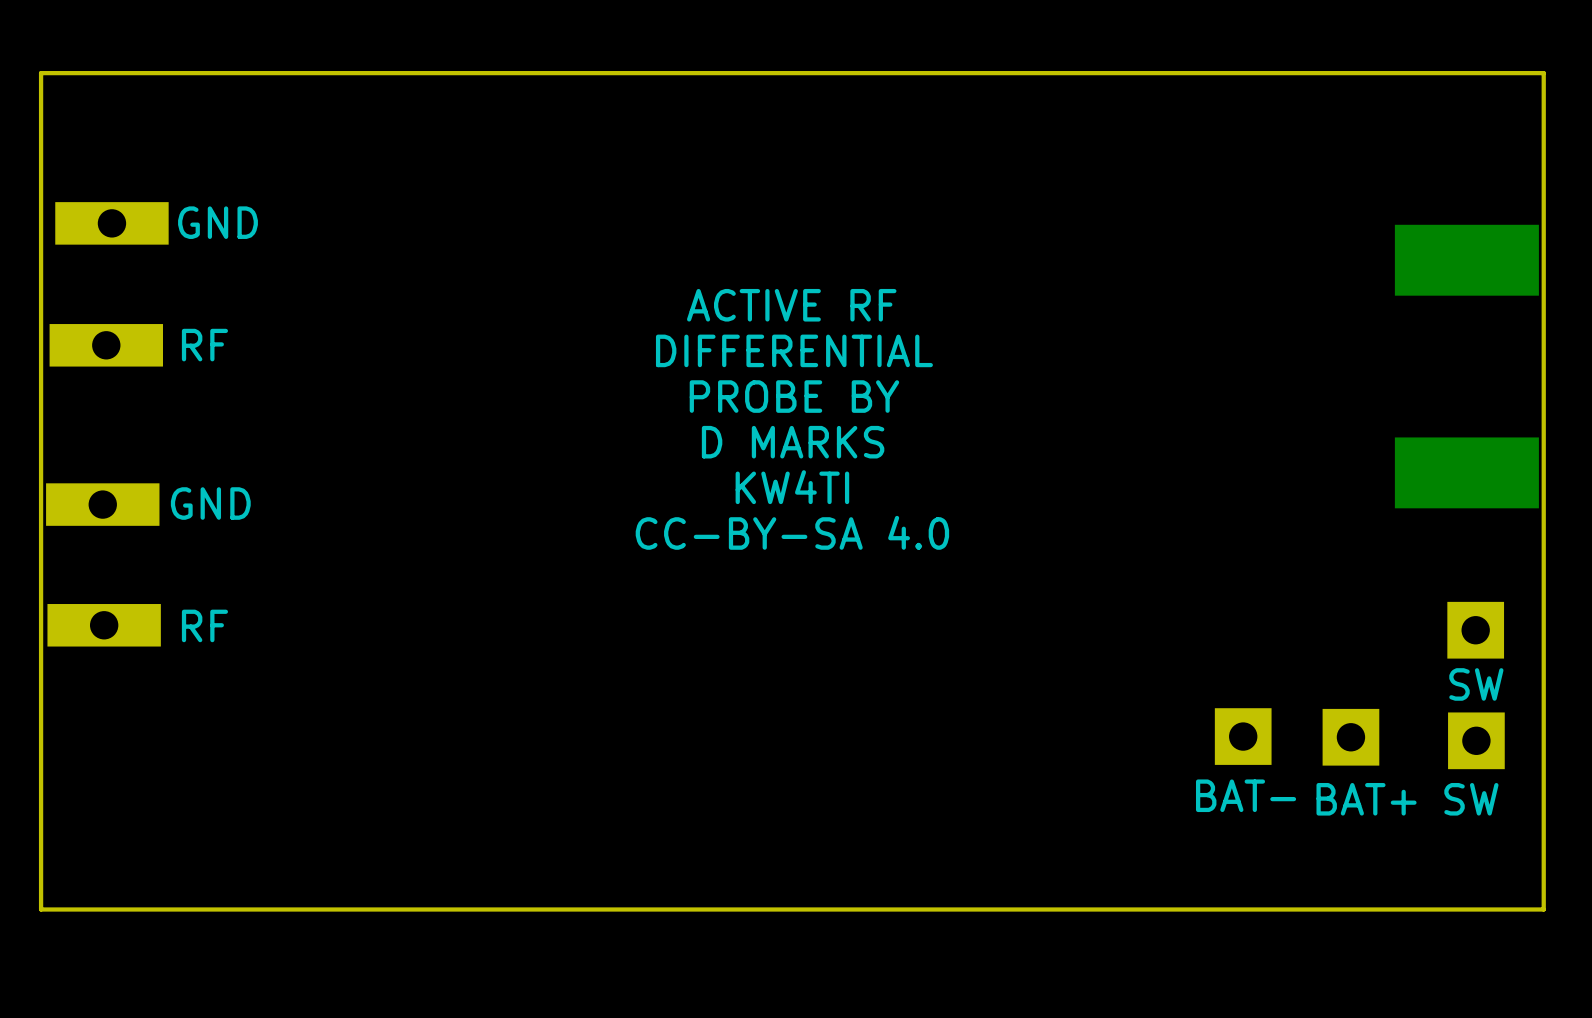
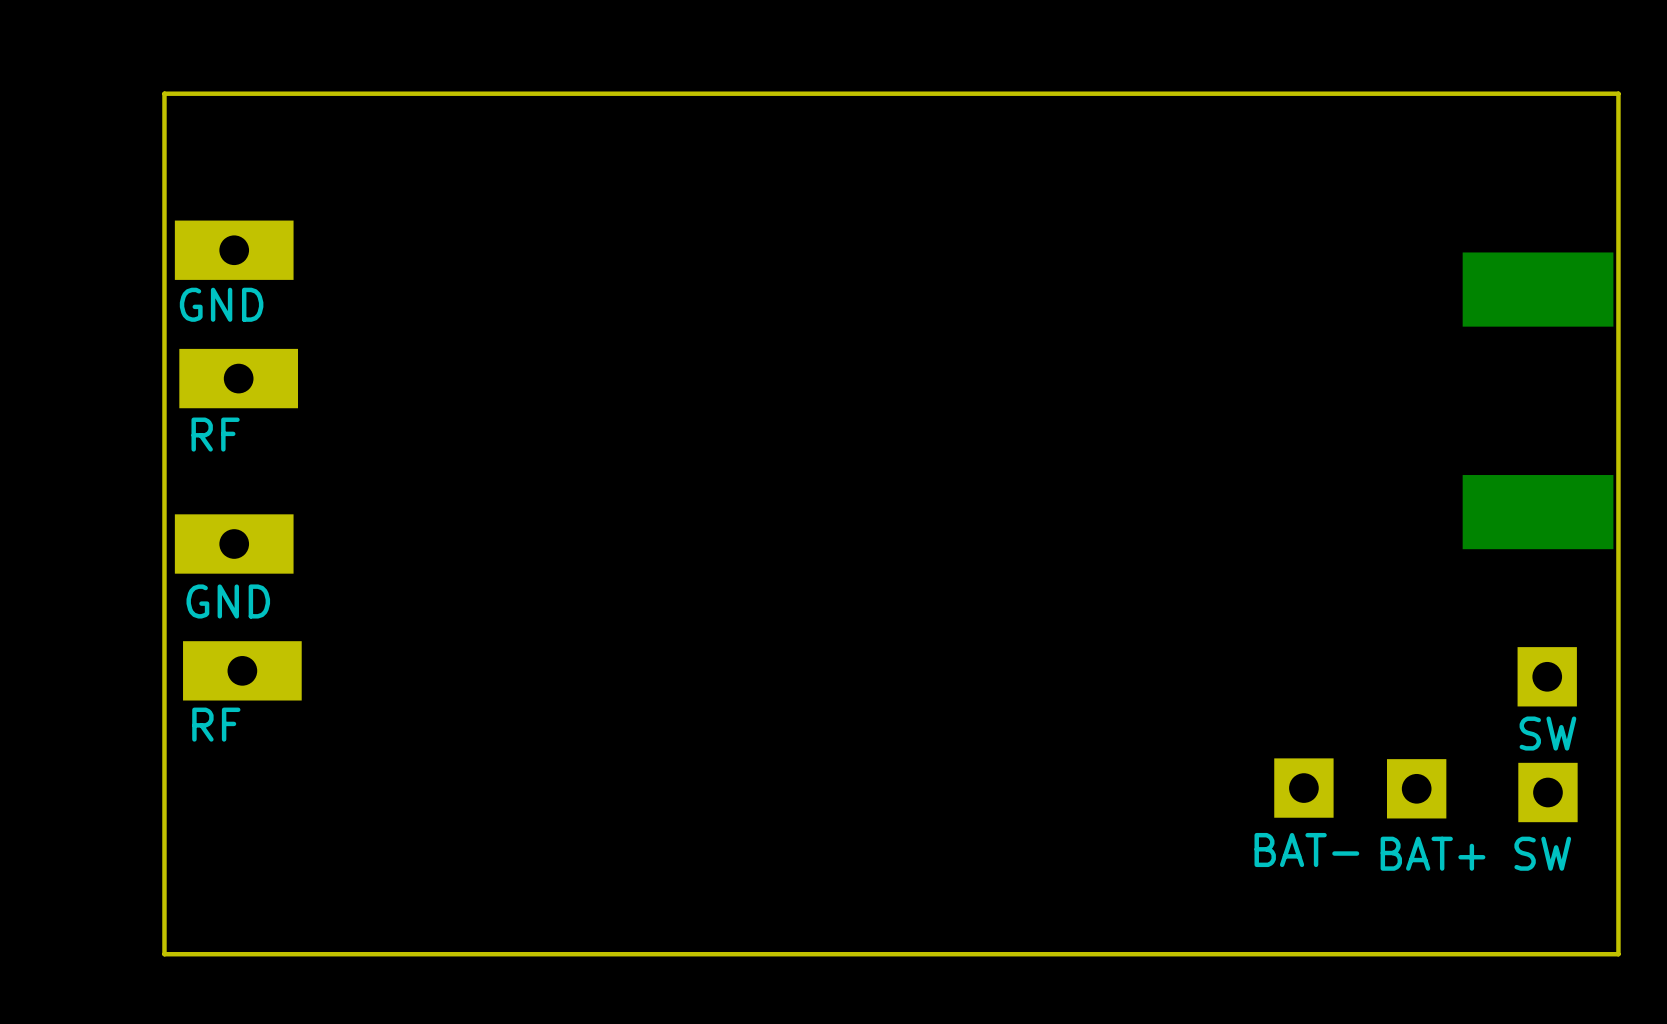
board edge: (154, 73) (41, 73) (41, 909) (1543, 909) (1543, 895) -> (164, 93) (164, 954) (1618, 954)
text position: GND (217, 222) -> GND (221, 304)
part: none -> (234, 250)
part: (111, 223) -> none
text: ACTIVE RF (791, 305) -> none
part: (106, 345) -> none
text position: RF (204, 345) -> RF (215, 434)
part: none -> (238, 378)
text: DIFFERENTIAL (794, 350) -> none
text: PROBE BY (794, 396) -> none
text: D MARKS (793, 442) -> none
text: KW4TI (792, 487) -> none
text position: GND (210, 503) -> GND (228, 601)
part: none -> (234, 544)
part: (102, 504) -> none
text: CC-BY-SA 4.0 (792, 532) -> none
part: none -> (242, 670)
part: (104, 625) -> none
text position: RF (204, 625) -> RF (216, 724)

